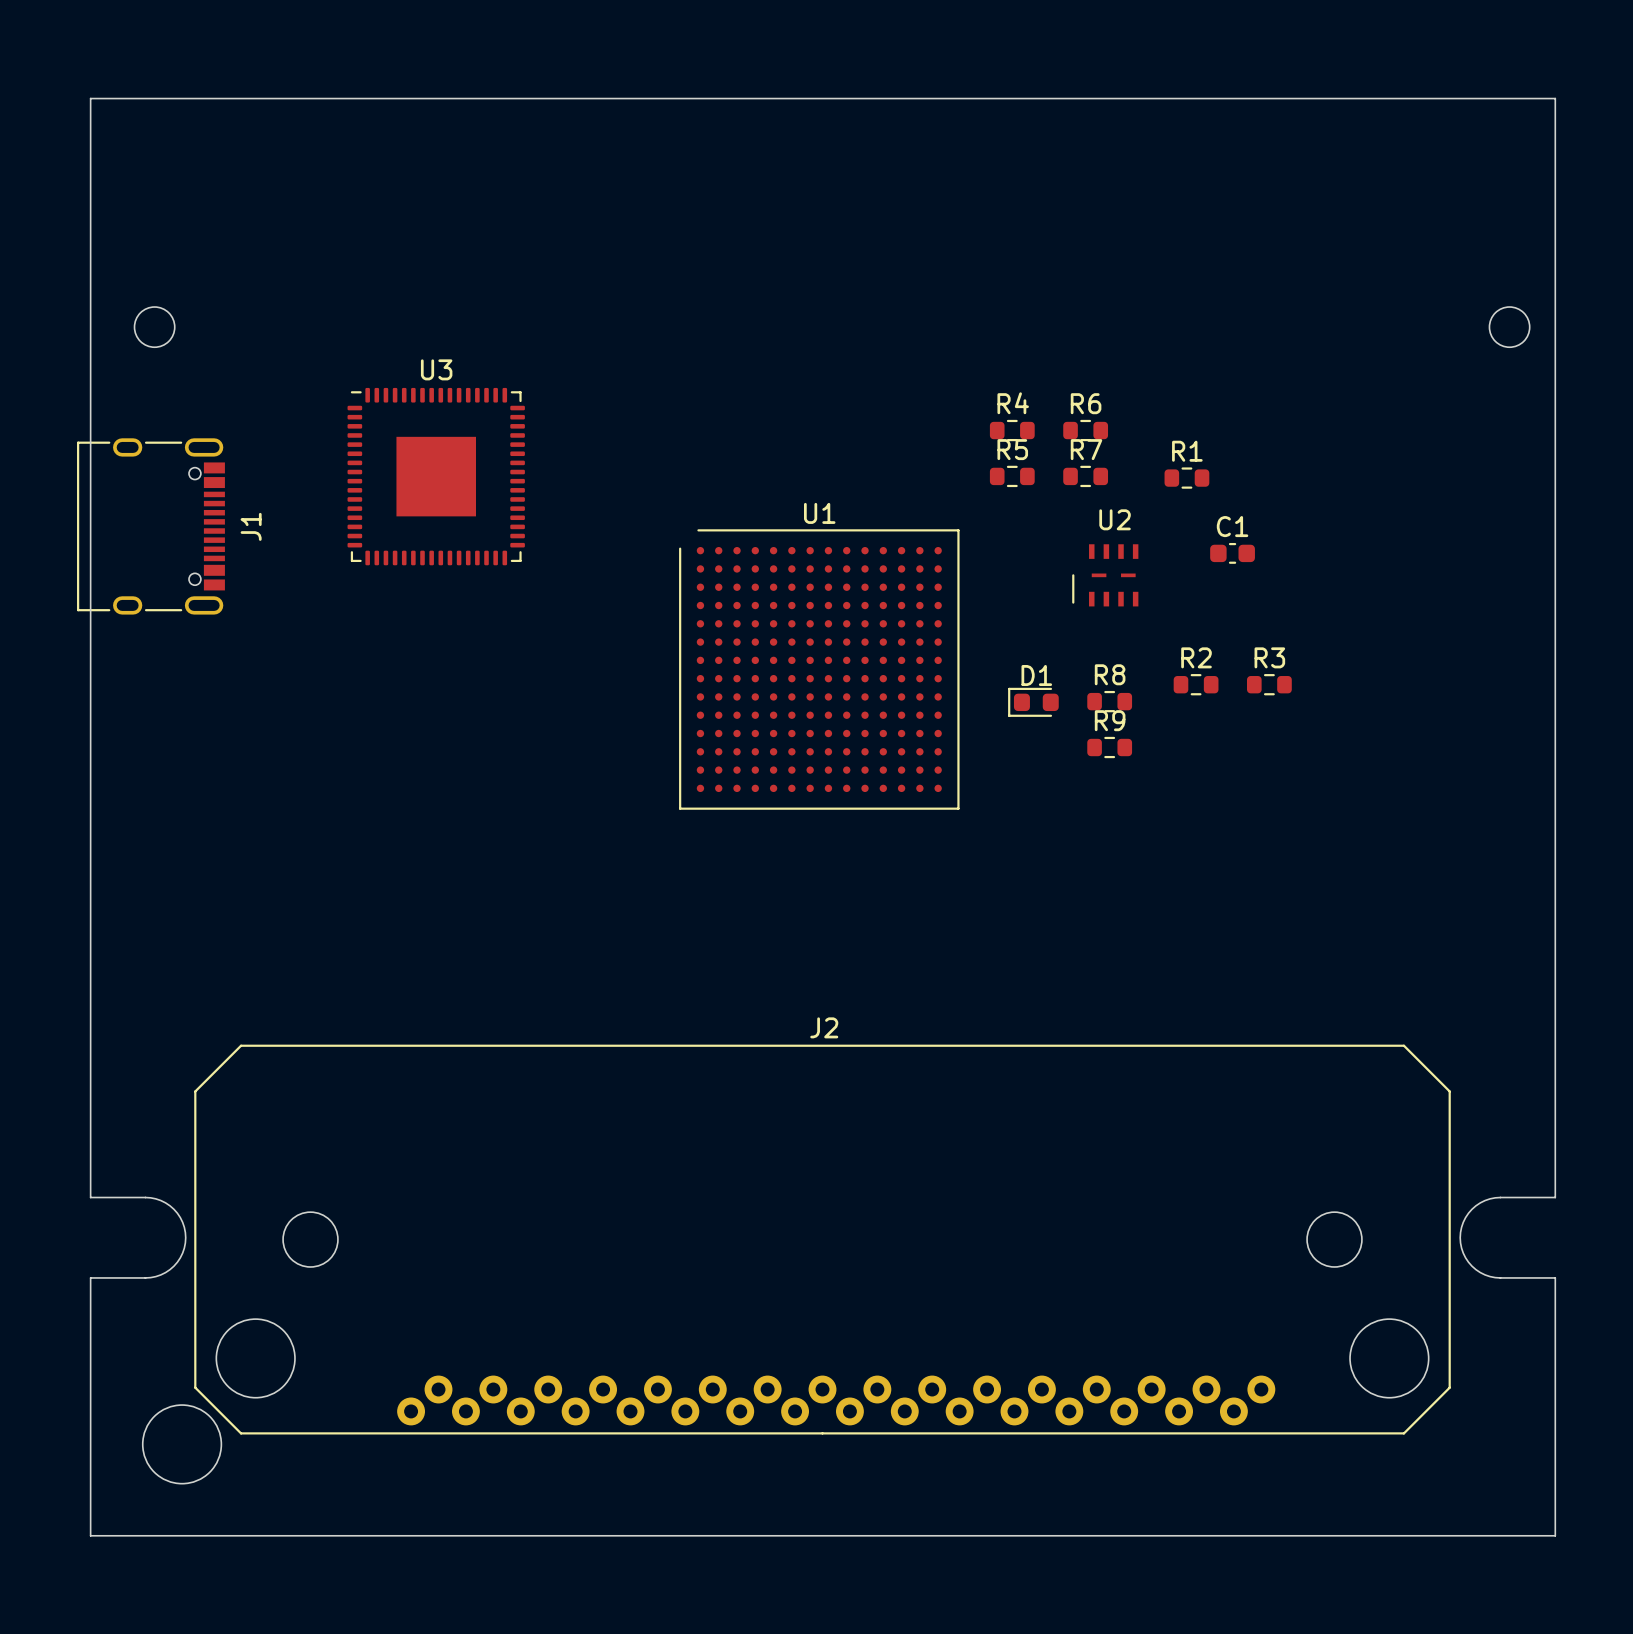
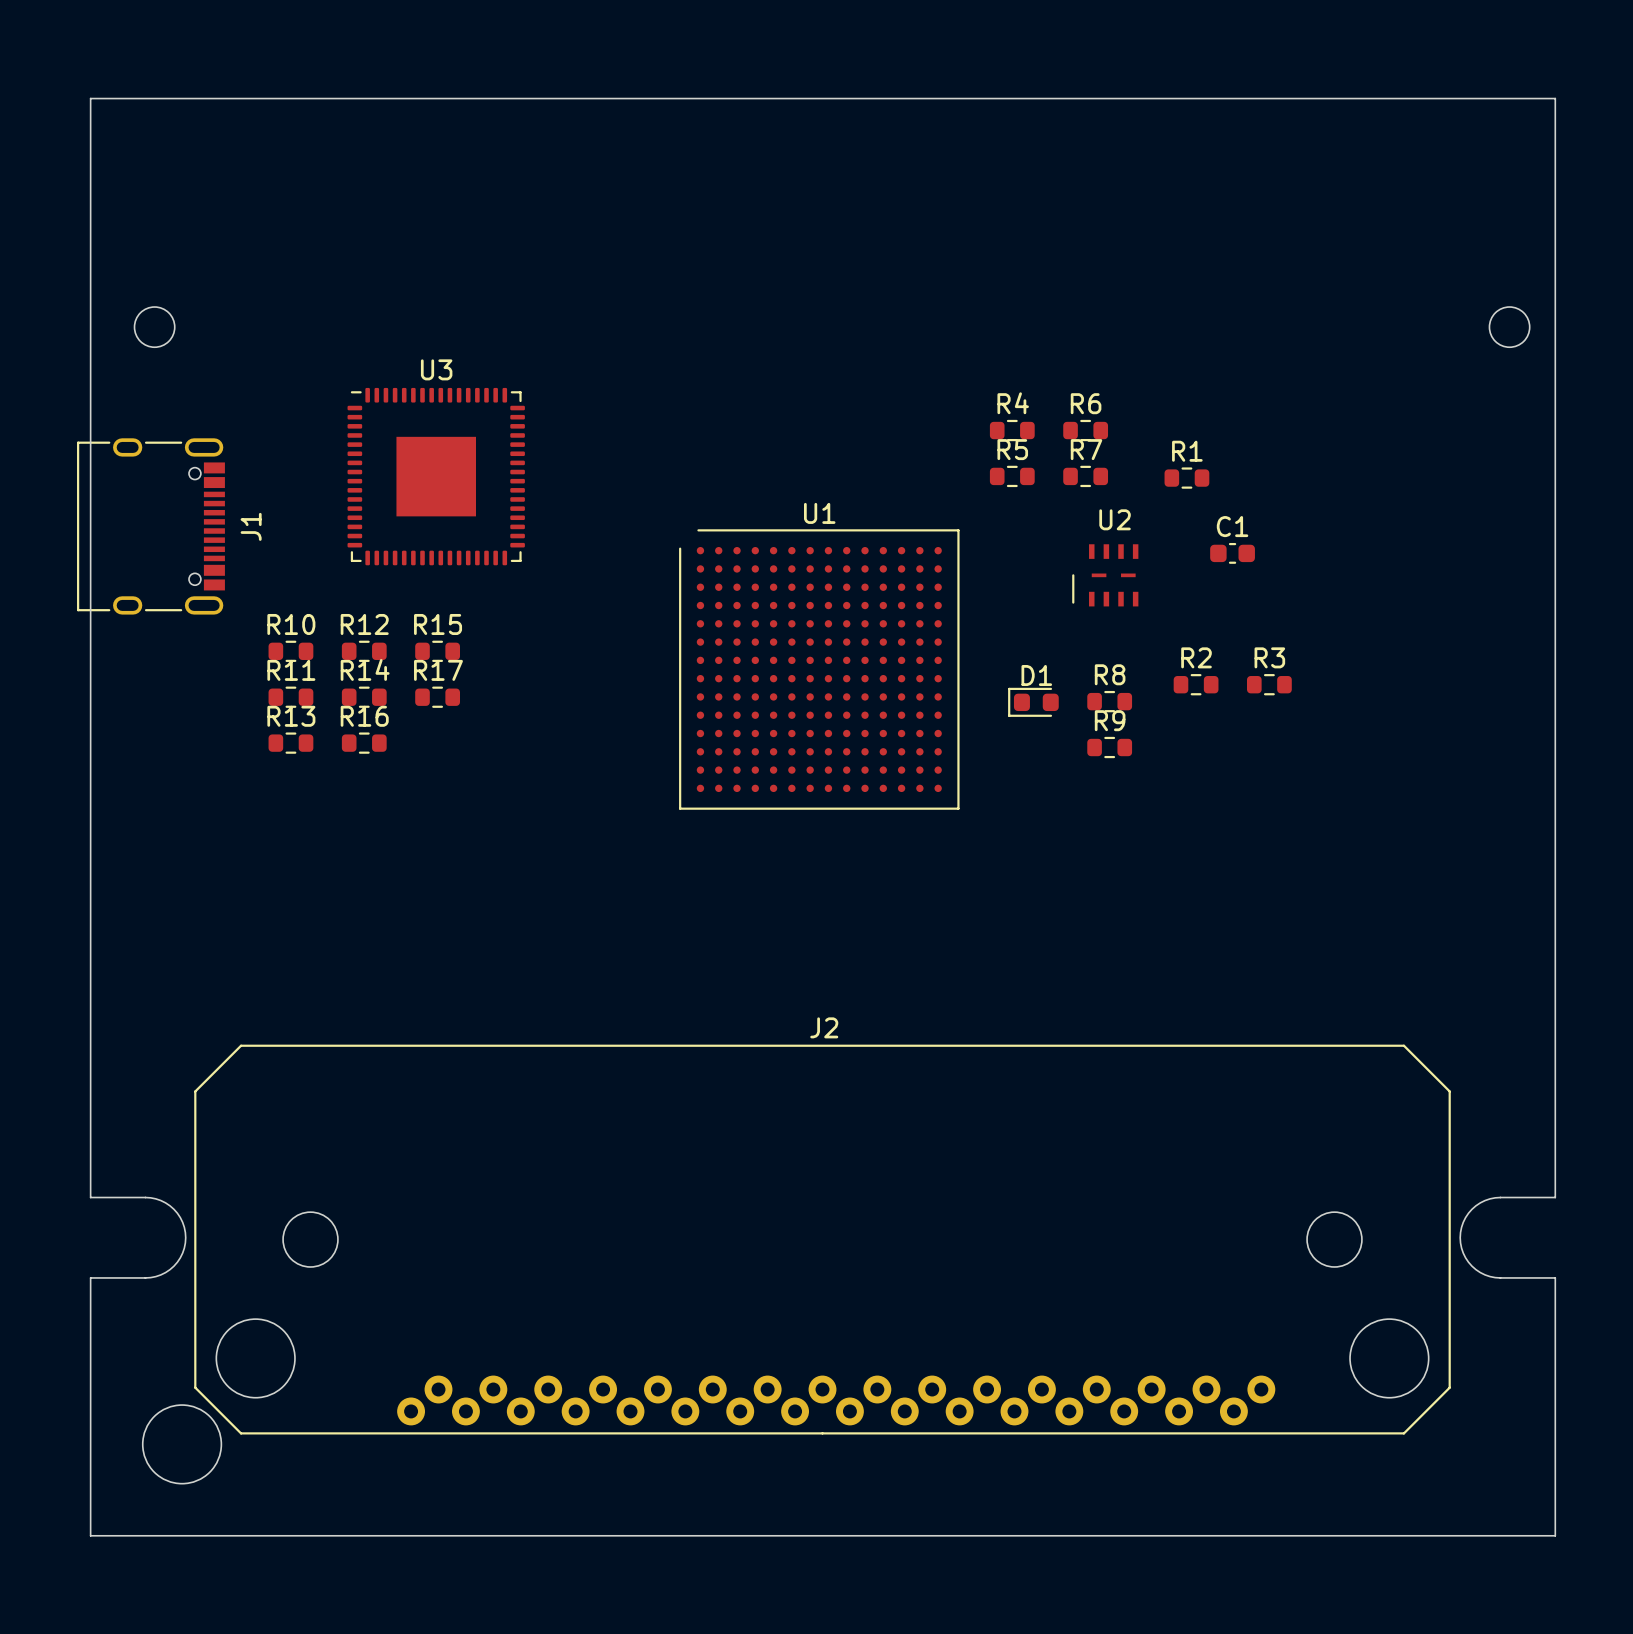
R10: none -> (290, 651)
R12: none -> (364, 651)
R15: none -> (437, 651)
R11: none -> (290, 697)
R14: none -> (364, 697)
R17: none -> (437, 697)
R13: none -> (290, 743)
R16: none -> (364, 743)

